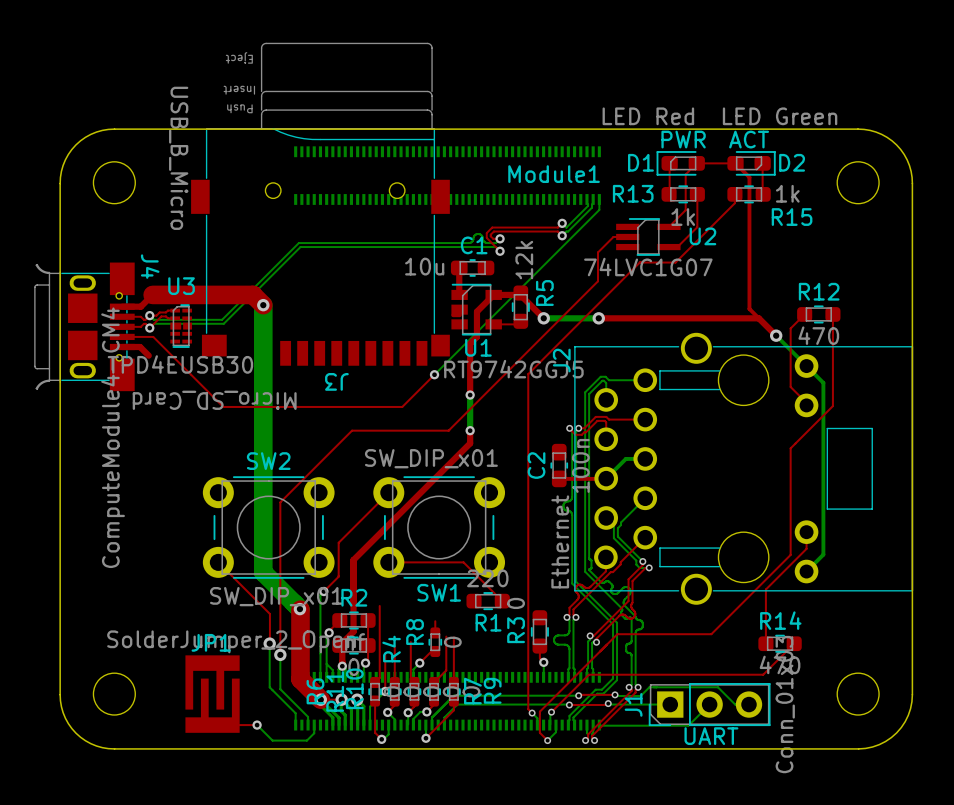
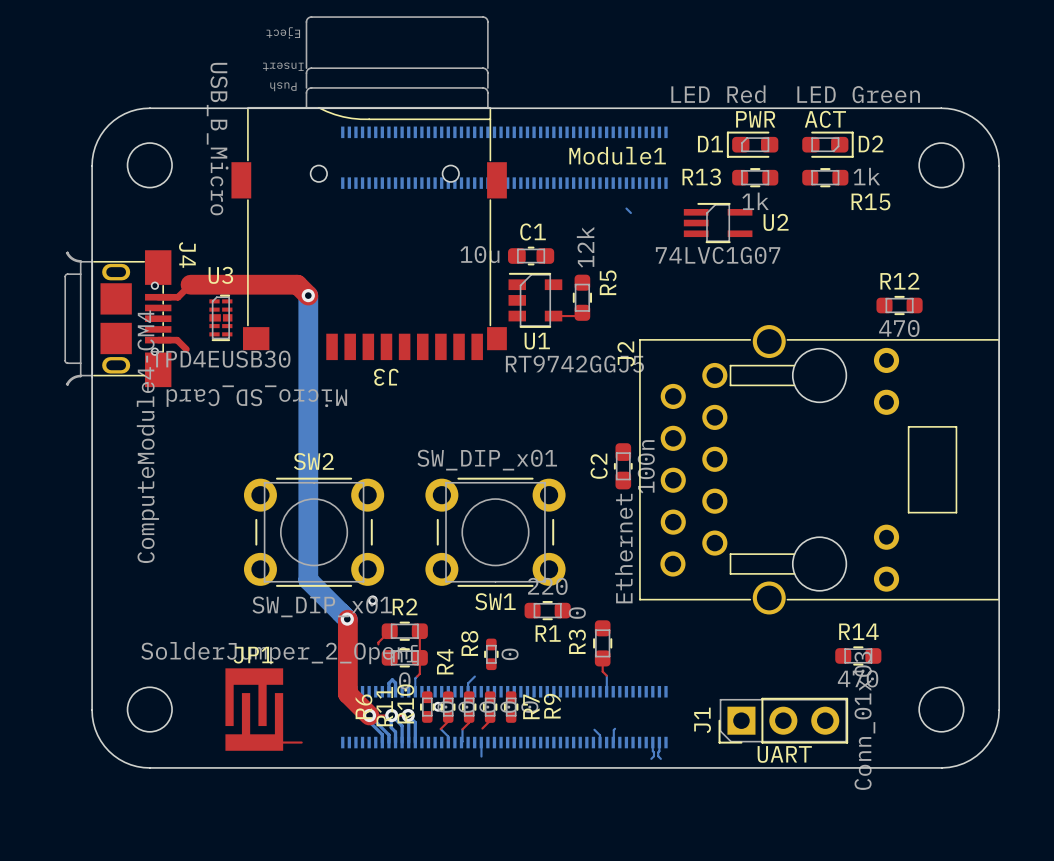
top track: (669, 163) (669, 194) -> none
top track: (762, 163) (763, 194) -> none
top track: (697, 194) (697, 227) (677, 247) (668, 247) -> none
top track: (734, 194) (734, 203) (675, 262) (639, 262) (528, 374) (528, 709) (532, 713) -> none
bottom track: (586, 199) (588, 205) (566, 227) -> none
bottom track: (593, 199) (592, 207) (562, 235) -> none
bottom track: (599, 199) (599, 209) (434, 374) -> none
top track: (562, 223) (557, 227) (492, 227) (486, 233) (486, 237) (500, 251) -> none
via: (562, 223) -> none
top track: (668, 226) (685, 210) (685, 174) (696, 163) (735, 163) (749, 177) (749, 308) (759, 319) -> none
bottom track: (478, 233) (468, 243) (298, 243) (222, 319) (153, 319) (149, 315) -> none
bottom track: (478, 233) (486, 242) (495, 243) (500, 238) -> none
top track: (562, 235) (557, 231) (493, 231) (490, 234) (493, 238) (500, 238) -> none
via: (562, 235) -> none
top track: (627, 236) (613, 236) (597, 252) (597, 281) (448, 430) (352, 430) (280, 502) (280, 655) -> none
via: (500, 238) -> none
bottom track: (500, 251) (495, 247) (300, 247) (223, 323) (153, 323) (149, 328) -> none
via: (500, 251) -> none
top track: (459, 267) (459, 294) -> none
top track: (175, 310) (159, 312) (156, 315) (149, 315) (145, 319) (140, 316) (122, 316) -> none
top track: (804, 314) (790, 328) (790, 387) (806, 402) (806, 405) -> none
top track: (832, 314) (832, 406) (790, 448) (790, 554) (711, 634) (617, 634) (539, 711) (539, 732) (547, 740) -> none
via: (149, 315) -> none
top track: (453, 315) (459, 315) -> none
top track: (175, 318) (161, 316) (149, 328) (145, 323) (140, 326) (122, 326) -> none
top track: (543, 318) (520, 295) (520, 293) (518, 294) (493, 294) (476, 311) (476, 336) (470, 343) (470, 395) -> none
bottom track: (543, 318) (598, 318) -> none
via: (543, 318) -> none
top track: (598, 318) (758, 318) (776, 335) -> none
via: (598, 318) -> none
via: (149, 328) -> none
bottom track: (776, 335) (823, 382) (823, 554) (806, 571) -> none
via: (776, 335) -> none
top track: (122, 336) (153, 336) (223, 406) (402, 406) (434, 374) -> none
via: (434, 374) -> none
bottom track: (645, 380) (609, 380) (605, 376) (600, 376) (585, 392) (585, 571) (621, 608) (621, 615) (625, 618) (631, 618) (631, 641) (626, 646) (626, 651) (631, 655) (631, 684) (629, 687) -> none
bottom track: (470, 395) (470, 430) -> none
via: (470, 395) -> none
bottom track: (606, 399) (606, 383) (602, 380) (589, 394) (589, 558) -> none
top track: (645, 419) (609, 419) (606, 416) (595, 416) (584, 428) (578, 428) -> none
top track: (569, 428) (575, 434) (581, 434) (597, 420) (604, 420) (606, 439) -> none
bottom track: (569, 428) (572, 430) (572, 497) (570, 500) (564, 503) (563, 506) (572, 514) (572, 583) (613, 624) (613, 678) (601, 689) (595, 689) (569, 715) (568, 725) -> none
via: (569, 428) -> none
bottom track: (578, 428) (576, 430) (576, 581) (617, 622) (617, 680) (603, 693) (597, 693) (573, 717) (574, 725) -> none
via: (578, 428) -> none
top track: (470, 430) (470, 443) (353, 560) (353, 631) (339, 645) (342, 648) (342, 666) -> none
via: (470, 430) -> none
bottom track: (645, 458) (625, 458) (606, 478) -> none
top track: (606, 478) (559, 478) -> none
top track: (388, 492) (338, 542) (338, 576) (323, 591) -> none
bottom track: (645, 498) (621, 522) (617, 528) (617, 536) (642, 561) -> none
bottom track: (606, 517) (613, 525) (613, 538) (636, 560) (636, 564) (639, 568) (649, 567) -> none
top track: (806, 532) (806, 548) (765, 589) (765, 643) -> none
top track: (645, 537) (613, 572) (610, 572) (573, 609) (573, 614) (575, 617) -> none
top track: (605, 557) (605, 571) (590, 586) (586, 588) (579, 584) (576, 586) (578, 598) (569, 607) (569, 614) (566, 617) -> none
bottom track: (590, 559) (590, 559) -> none
bottom track: (591, 560) (591, 567) -> none
top track: (642, 561) (642, 565) (628, 579) (628, 601) (593, 635) (590, 635) -> none
via: (642, 561) -> none
top track: (218, 562) (269, 613) (269, 643) -> none
top track: (388, 562) (463, 562) (502, 601) -> none
top track: (649, 567) (645, 567) (632, 581) (631, 606) (635, 612) (634, 616) (630, 618) (624, 614) (620, 615) (596, 638) (596, 642) -> none
via: (649, 567) -> none
bottom track: (589, 570) (601, 582) (609, 581) (612, 585) (610, 590) (612, 593) (617, 593) (625, 587) (630, 590) (623, 604) (642, 623) (642, 628) (635, 633) (635, 684) (638, 687) -> none
bottom track: (323, 591) (320, 595) (320, 677) -> none
top track: (379, 606) (379, 677) (375, 682) -> none
bottom track: (566, 617) (569, 619) (569, 632) (565, 635) (556, 635) (553, 640) (556, 644) (565, 644) (569, 647) (568, 677) -> none
via: (566, 617) -> none
bottom track: (575, 617) (573, 619) (574, 677) -> none
via: (575, 617) -> none
top track: (435, 621) (435, 632) -> none
bottom track: (329, 632) (326, 635) (326, 677) -> none
via: (329, 632) -> none
bottom track: (590, 635) (588, 641) (586, 677) -> none
via: (590, 635) -> none
top track: (446, 636) (446, 670) (434, 682) -> none
top track: (453, 637) (453, 682) -> none
top track: (410, 642) (410, 678) (414, 682) -> none
bottom track: (596, 642) (592, 643) (593, 677) -> none
via: (596, 642) -> none
bottom track: (269, 643) (269, 687) (295, 713) (295, 725) -> none
via: (269, 643) -> none
top track: (794, 643) (763, 674) (588, 674) (551, 712) -> none
top track: (394, 646) (394, 682) -> none
top track: (435, 651) (431, 651) (419, 663) -> none
via: (280, 654) -> none
top track: (385, 654) (385, 691) -> none
bottom track: (280, 655) (280, 689) (308, 716) (308, 725) -> none
via: (543, 662) -> none
via: (365, 663) -> none
via: (419, 663) -> none
bottom track: (326, 664) (332, 670) (332, 677) -> none
via: (342, 666) -> none
top track: (629, 687) (631, 690) (588, 734) (585, 740) -> none
via: (629, 687) -> none
top track: (638, 687) (635, 692) (592, 736) (594, 740) -> none
via: (638, 687) -> none
bottom track: (385, 691) (370, 706) (370, 725) -> none
top track: (615, 694) (578, 695) -> none
bottom track: (615, 694) (640, 696) (649, 687) (717, 687) (735, 704) (748, 704) -> none
via: (615, 694) -> none
bottom track: (578, 695) (453, 695) (432, 717) (432, 725) -> none
via: (578, 695) -> none
top track: (453, 701) (453, 710) (425, 738) -> none
top track: (608, 703) (569, 705) -> none
bottom track: (608, 703) (670, 704) -> none
via: (608, 703) -> none
top track: (378, 704) (375, 701) (375, 732) (381, 739) -> none
bottom track: (709, 704) (688, 725) (599, 725) -> none
bottom track: (569, 705) (457, 704) (444, 717) (444, 725) -> none
via: (569, 705) -> none
bottom track: (426, 711) (420, 711) (413, 718) (413, 725) -> none
via: (426, 711) -> none
via: (387, 712) -> none
via: (408, 712) -> none
via: (551, 712) -> none
via: (532, 713) -> none
bottom track: (257, 725) (272, 740) (306, 740) (314, 733) (314, 725) -> none
via: (257, 725) -> none
bottom track: (388, 725) (388, 734) (381, 739) -> none
bottom track: (555, 725) (555, 732) (547, 740) -> none
via: (425, 738) -> none
via: (381, 739) -> none
via: (547, 740) -> none
via: (585, 740) -> none
via: (594, 740) -> none

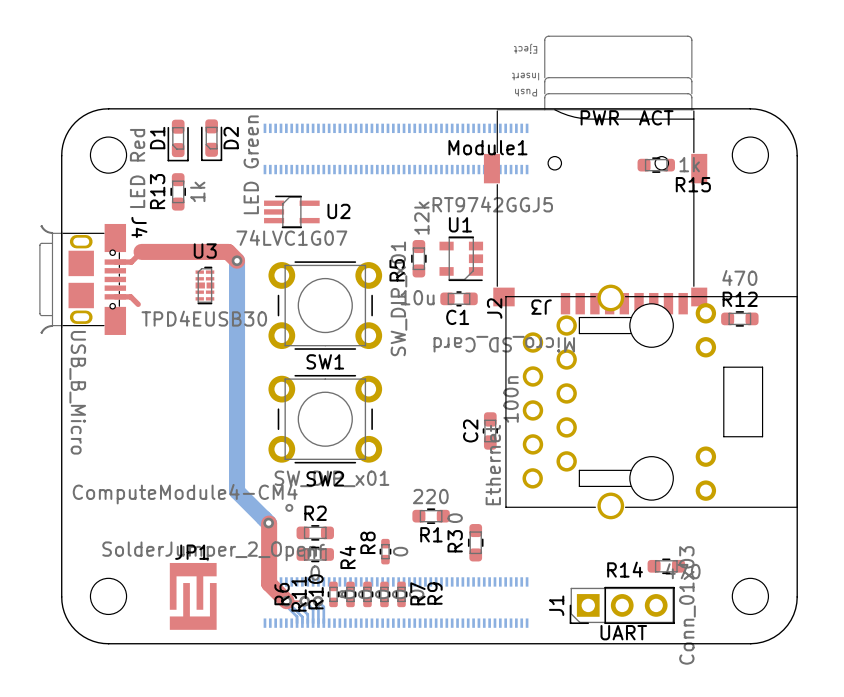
J4 value position: USB_B_Micro (217, 139) -> USB_B_Micro (77, 392)
D1 rotation: 0° (752, 144) -> 90° counterclockwise (178, 140)
D1 position: (752, 144) -> (178, 140)
D2 rotation: 0° (827, 144) -> 90° clockwise (211, 140)
D2 position: (827, 144) -> (211, 140)
R13 rotation: 0° (755, 177) -> 90° clockwise (178, 191)
R13 position: (755, 177) -> (178, 191)
J3 position: (369, 188) -> (595, 175)
R13 value position: 1k (755, 201) -> 1k (197, 191)
bottom track: (626, 208) (630, 213) -> none
U2 position: (718, 223) -> (291, 211)
C1 name position: C1 (533, 231) -> C1 (457, 317)
C1 position: (531, 256) -> (459, 298)
R5 name position: R5 (608, 282) -> R5 (397, 270)
R5 position: (582, 297) -> (418, 258)
U1 rotation: 0° (535, 300) -> 180° (461, 258)
U1 position: (535, 300) -> (461, 258)
R12 position: (899, 305) -> (739, 318)
top track: (582, 312) (579, 316) (553, 316) -> none
U3 position: (220, 317) -> (204, 285)
R12 value position: 470 (899, 328) -> 470 (739, 277)
U1 value position: RT9742GGJ5 (574, 364) -> RT9742GGJ5 (492, 204)
J3 name position: J3 (386, 377) -> J3 (541, 307)
Module1 value rotation: 0° (147, 436) -> 90° clockwise (185, 494)
SW1 value rotation: 0° (487, 460) -> 90° counterclockwise (398, 298)
SW2 name position: SW2 (313, 461) -> SW2 (325, 478)
C2 position: (623, 466) -> (490, 430)
SW2 position: (314, 532) -> (325, 419)
SW1 position: (495, 532) -> (325, 305)
top track: (389, 631) (378, 644) -> none
top track: (419, 631) (419, 673) (417, 676) -> none
R14 name position: R14 (858, 631) -> R14 (625, 569)
R14 position: (858, 655) -> (666, 566)
top track: (602, 658) (602, 671) (606, 675) -> none
bottom track: (606, 675) (606, 691) -> none
bottom track: (417, 676) (415, 678) (415, 691) -> none
bottom track: (474, 676) (468, 683) (468, 692) -> none
bottom track: (388, 691) (388, 683) (392, 679) (395, 682) (395, 691) -> none
top track: (448, 716) (448, 721) (440, 729) -> none
top track: (469, 716) (469, 722) (462, 729) -> none
top track: (490, 716) (490, 720) (482, 728) -> none
bottom track: (615, 728) (613, 741) -> none
bottom track: (440, 729) (448, 736) (448, 742) -> none
bottom track: (462, 729) (461, 742) -> none
bottom track: (594, 729) (600, 735) (600, 742) -> none
top track: (258, 742) (301, 742) -> none
bottom track: (652, 742) (653, 756) (651, 758) -> none
bottom track: (659, 742) (658, 756) (660, 758) -> none
bottom track: (481, 743) (481, 756) -> none

